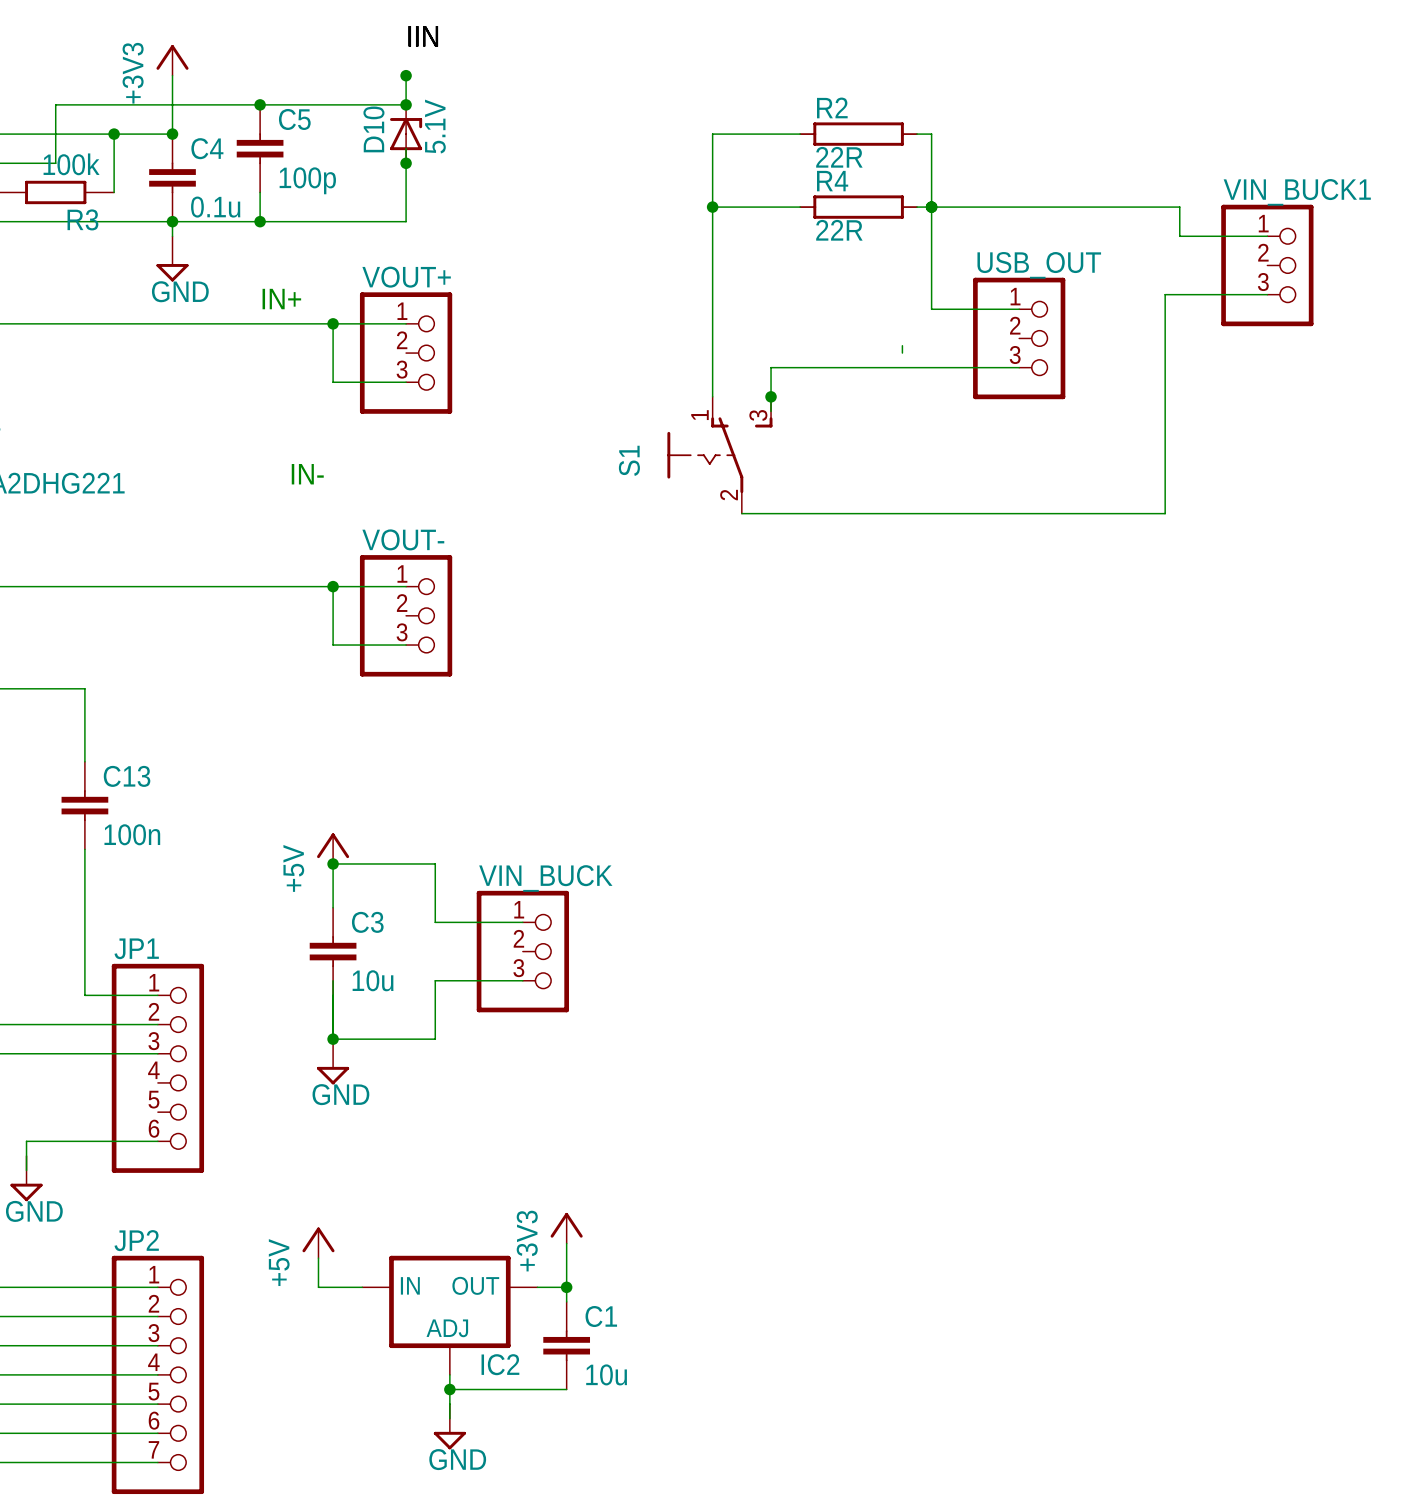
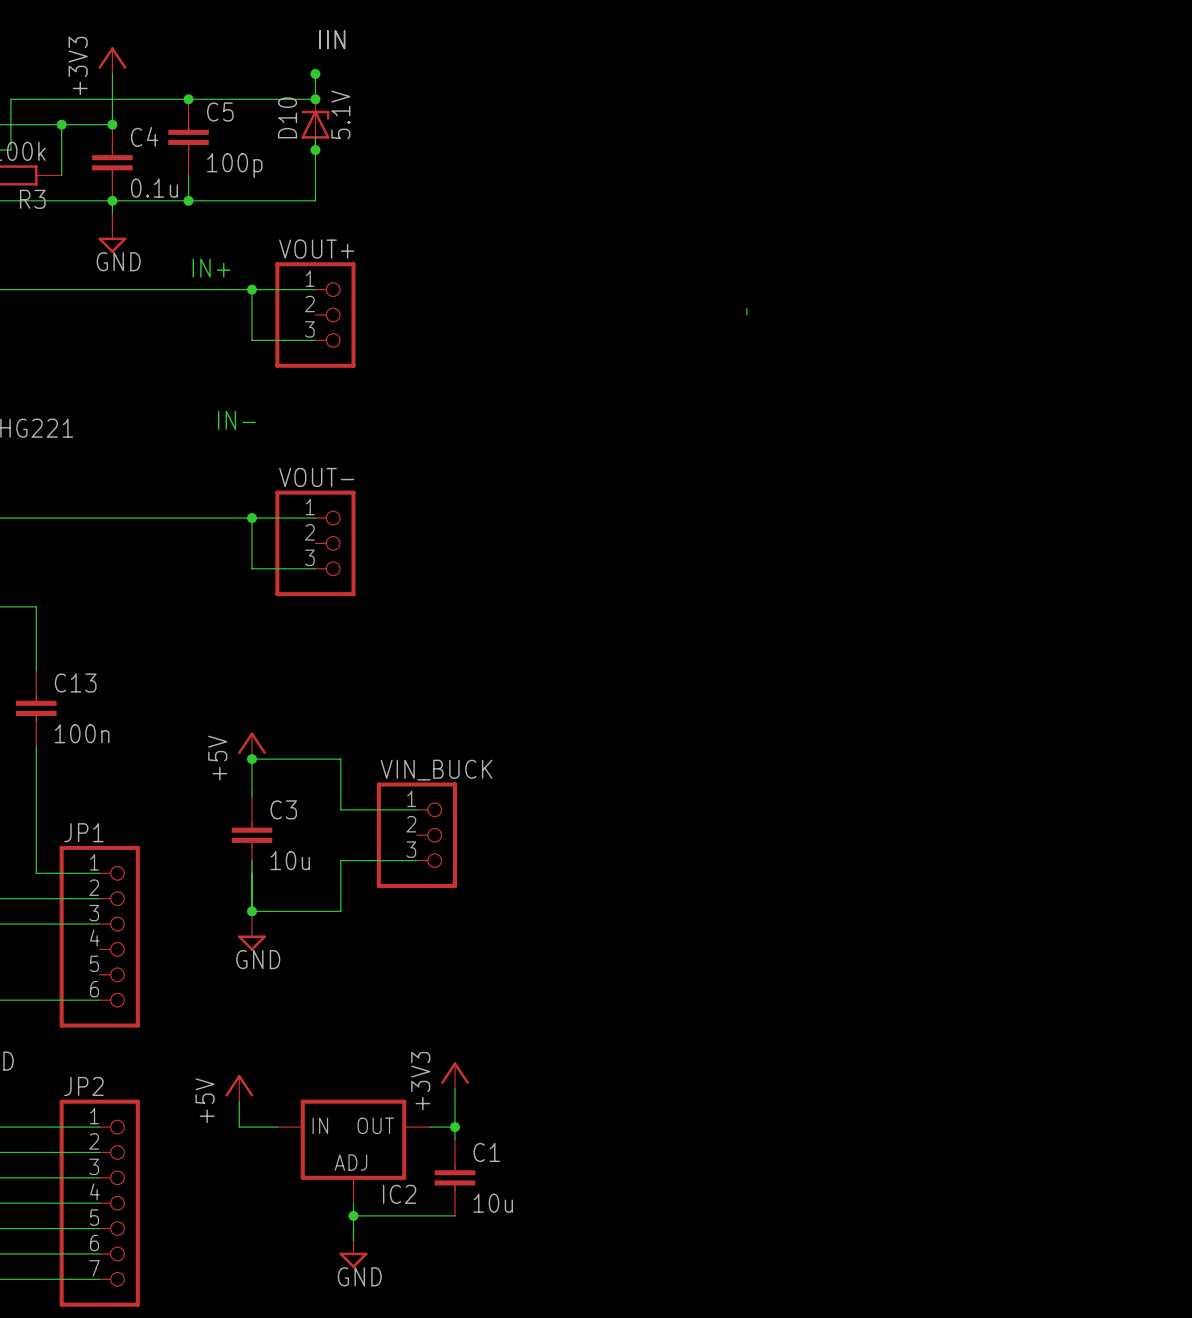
wire: (800, 134) (712, 134) (712, 396) -> none
R2: 22R (858, 134) -> none
wire: (917, 134) (931, 134) (931, 309) (1019, 309) -> none
wire: (712, 207) (800, 207) -> none
junction: (712, 207) -> none
R4: 22R (858, 207) -> none
wire: (917, 207) (1179, 207) (1179, 236) (1267, 236) -> none
junction: (931, 207) -> none
VIN_BUCK1: (1267, 265) -> none
wire: (1267, 294) (1165, 294) (1165, 513) (741, 513) -> none
USB_OUT: (1019, 338) -> none
wire: (1019, 367) (771, 367) (771, 411) -> none
junction: (771, 396) -> none
S1: (719, 455) -> none

